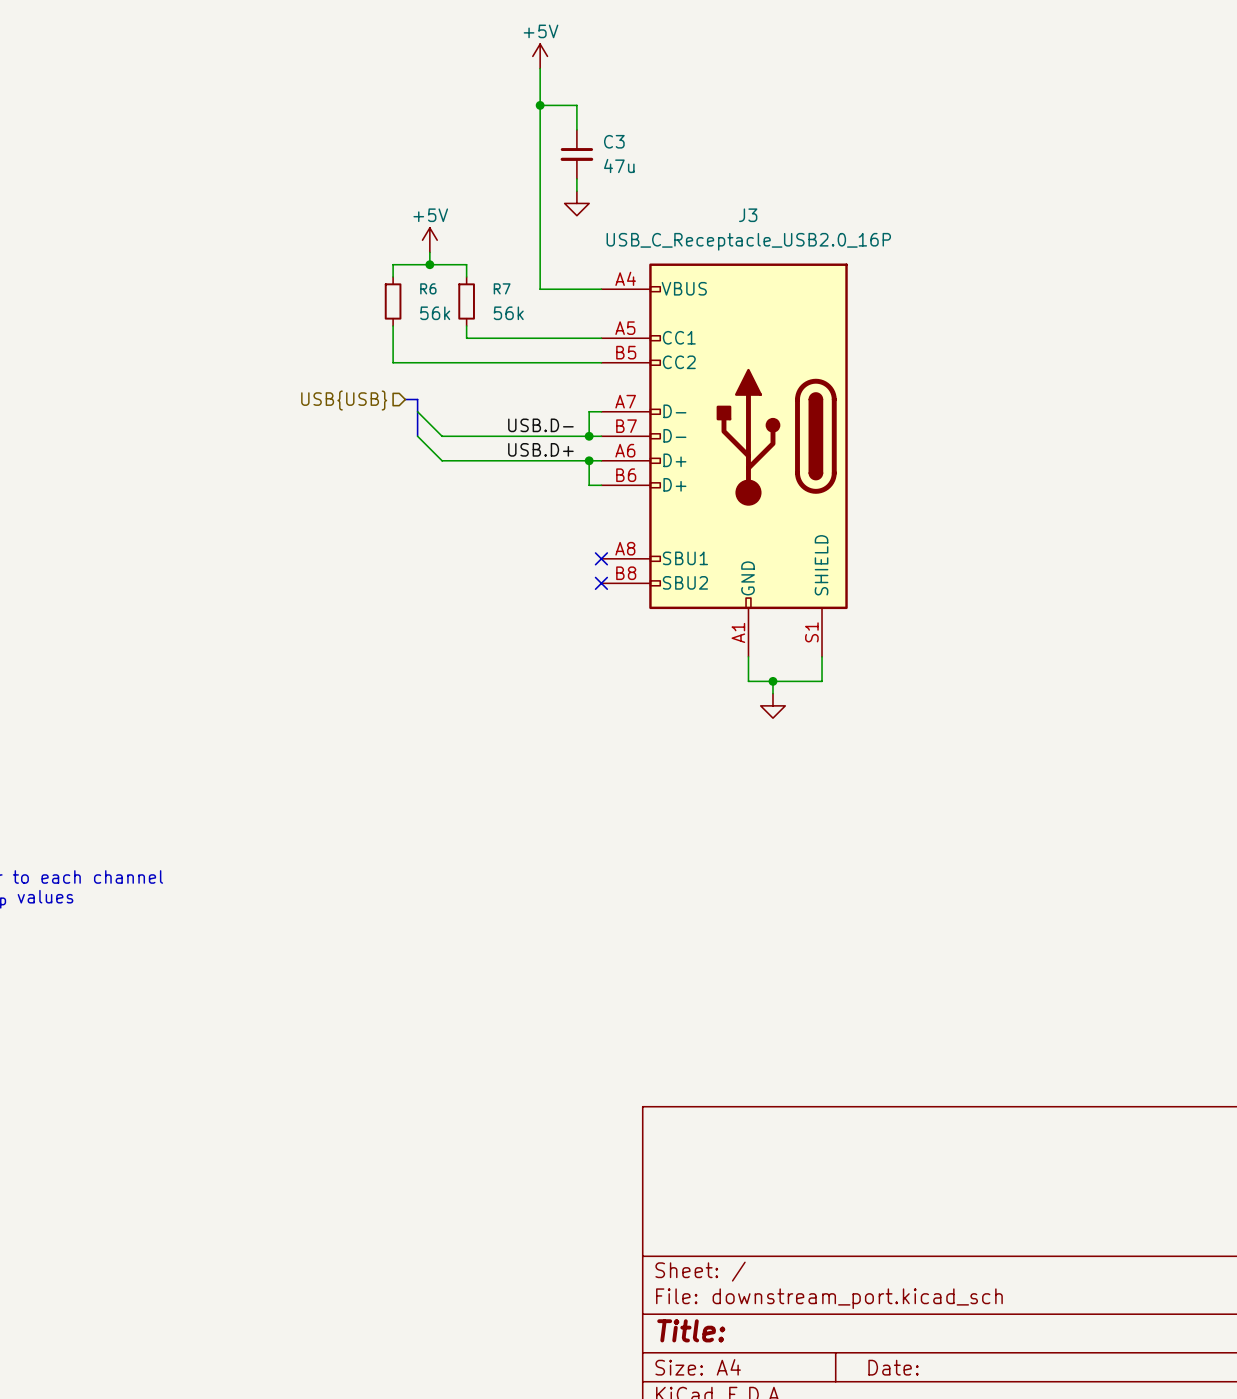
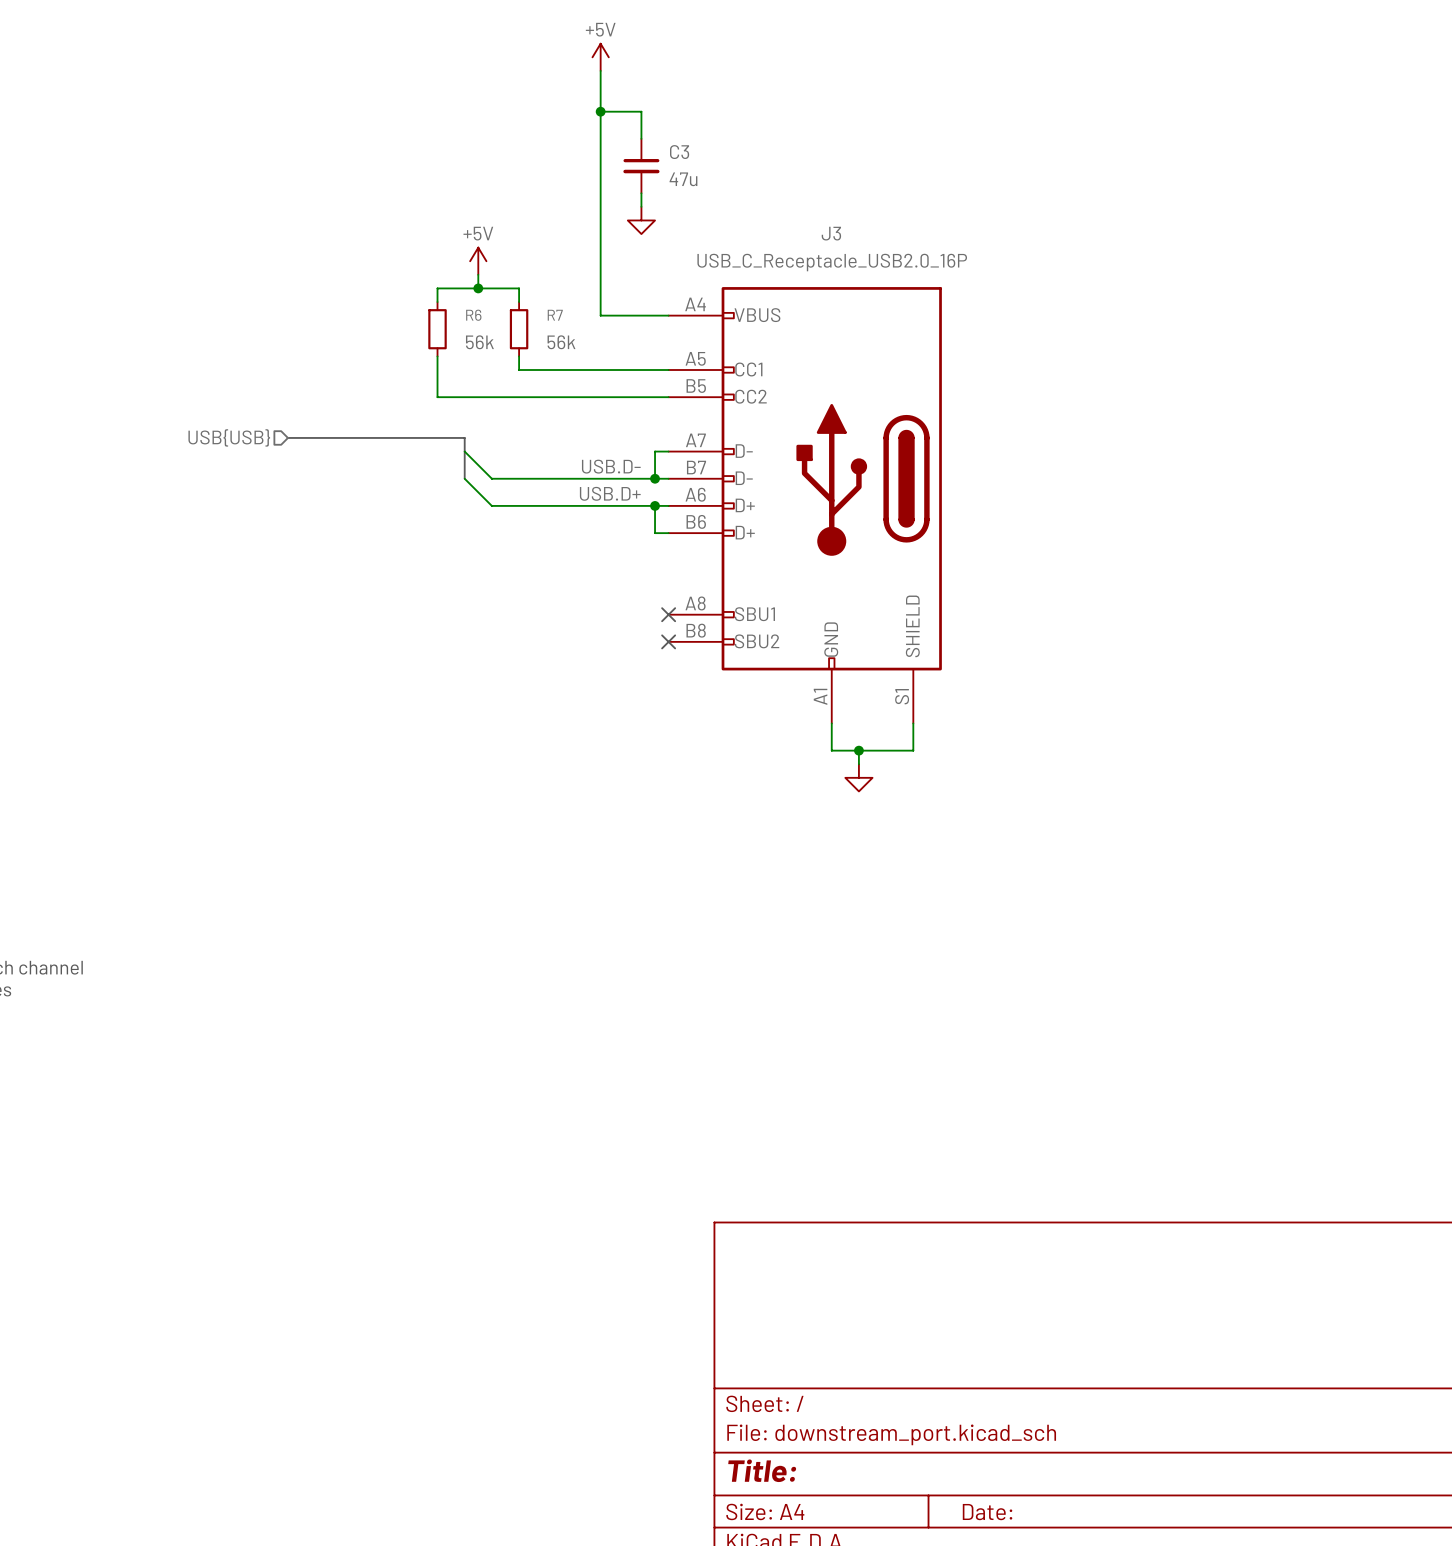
bus: none -> (287, 437) (451, 437)
hierarchical label position: USB{USB} (344, 400) -> USB{USB} (229, 437)

